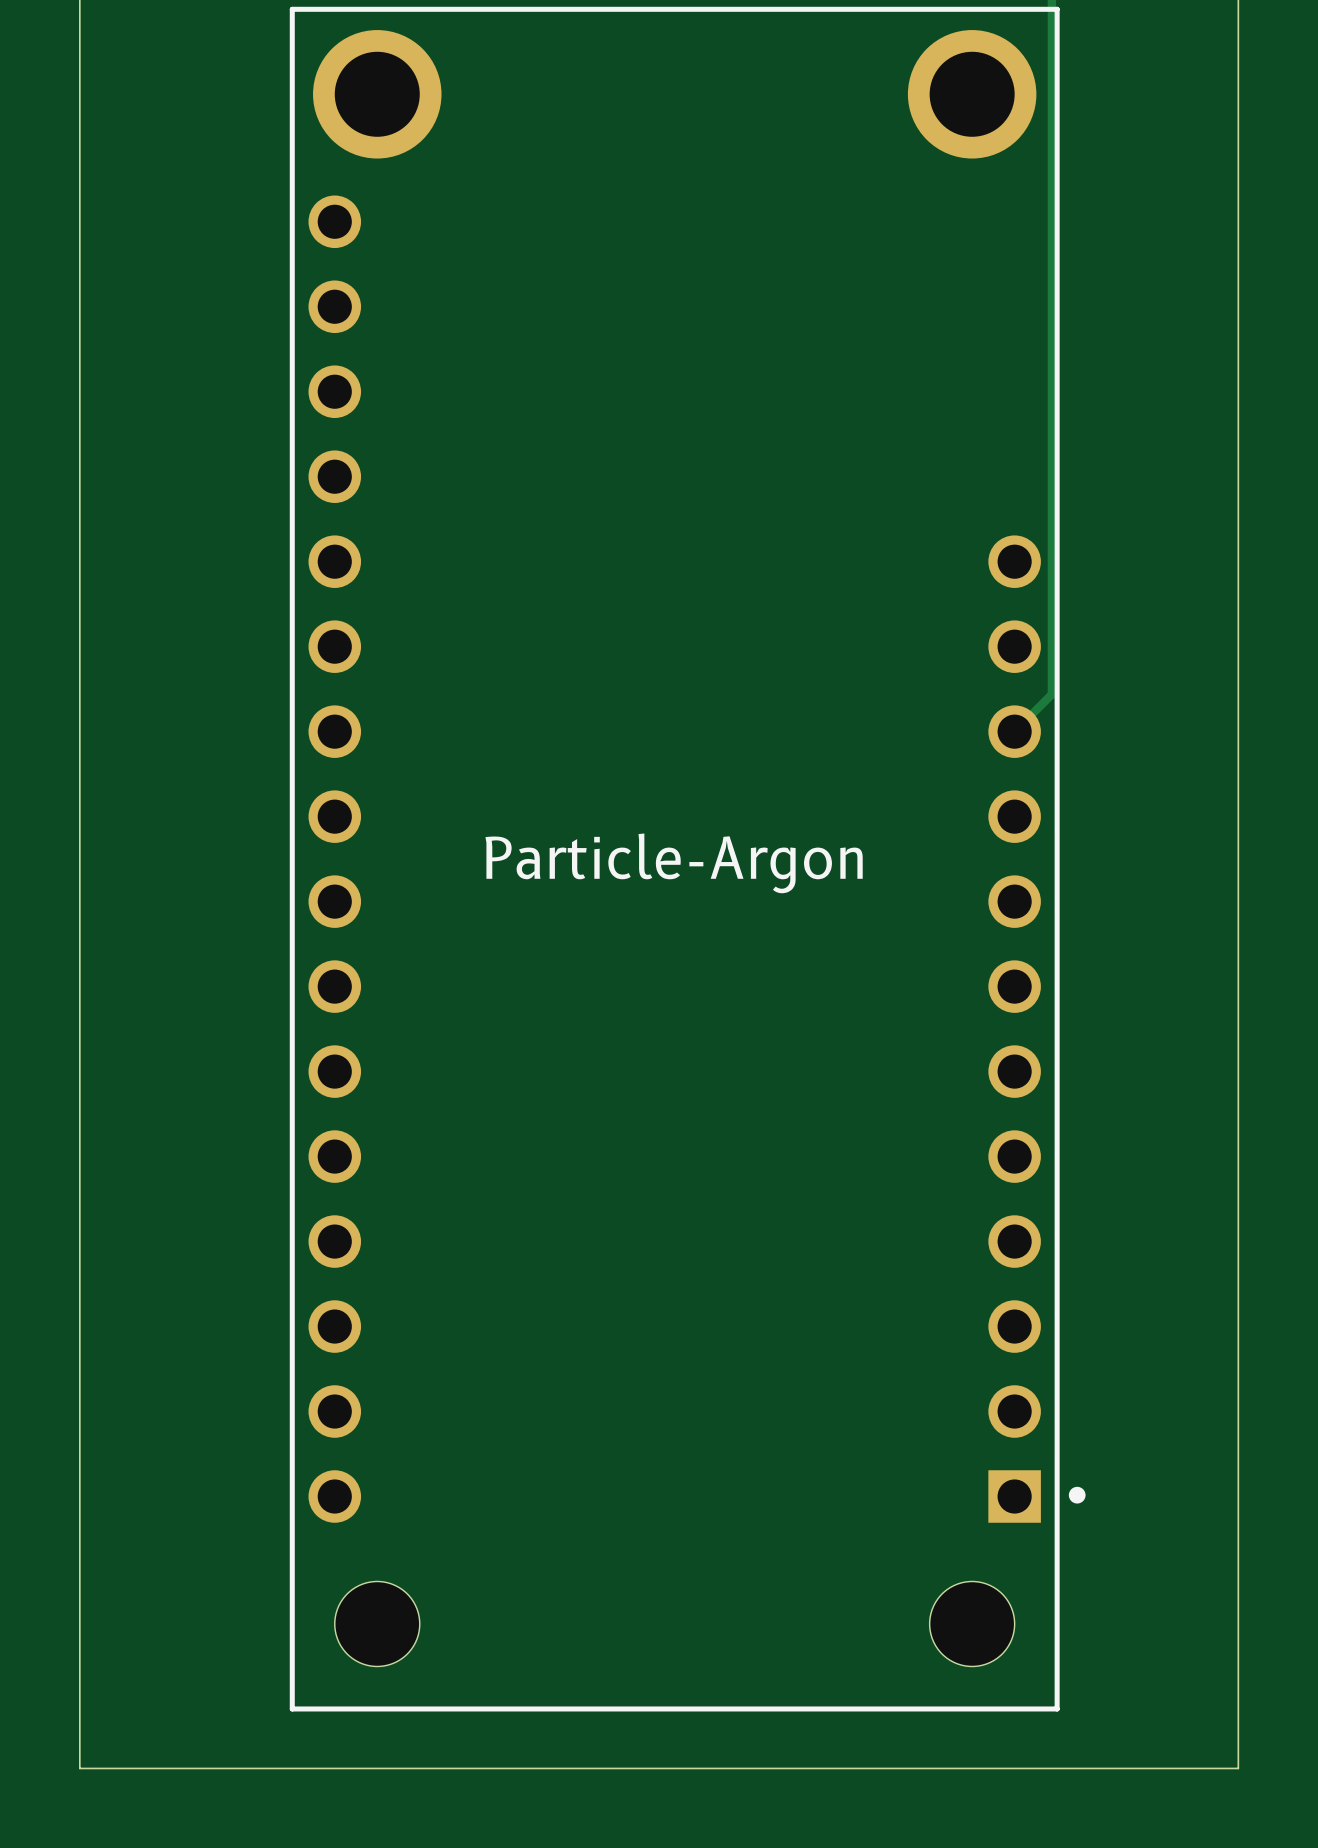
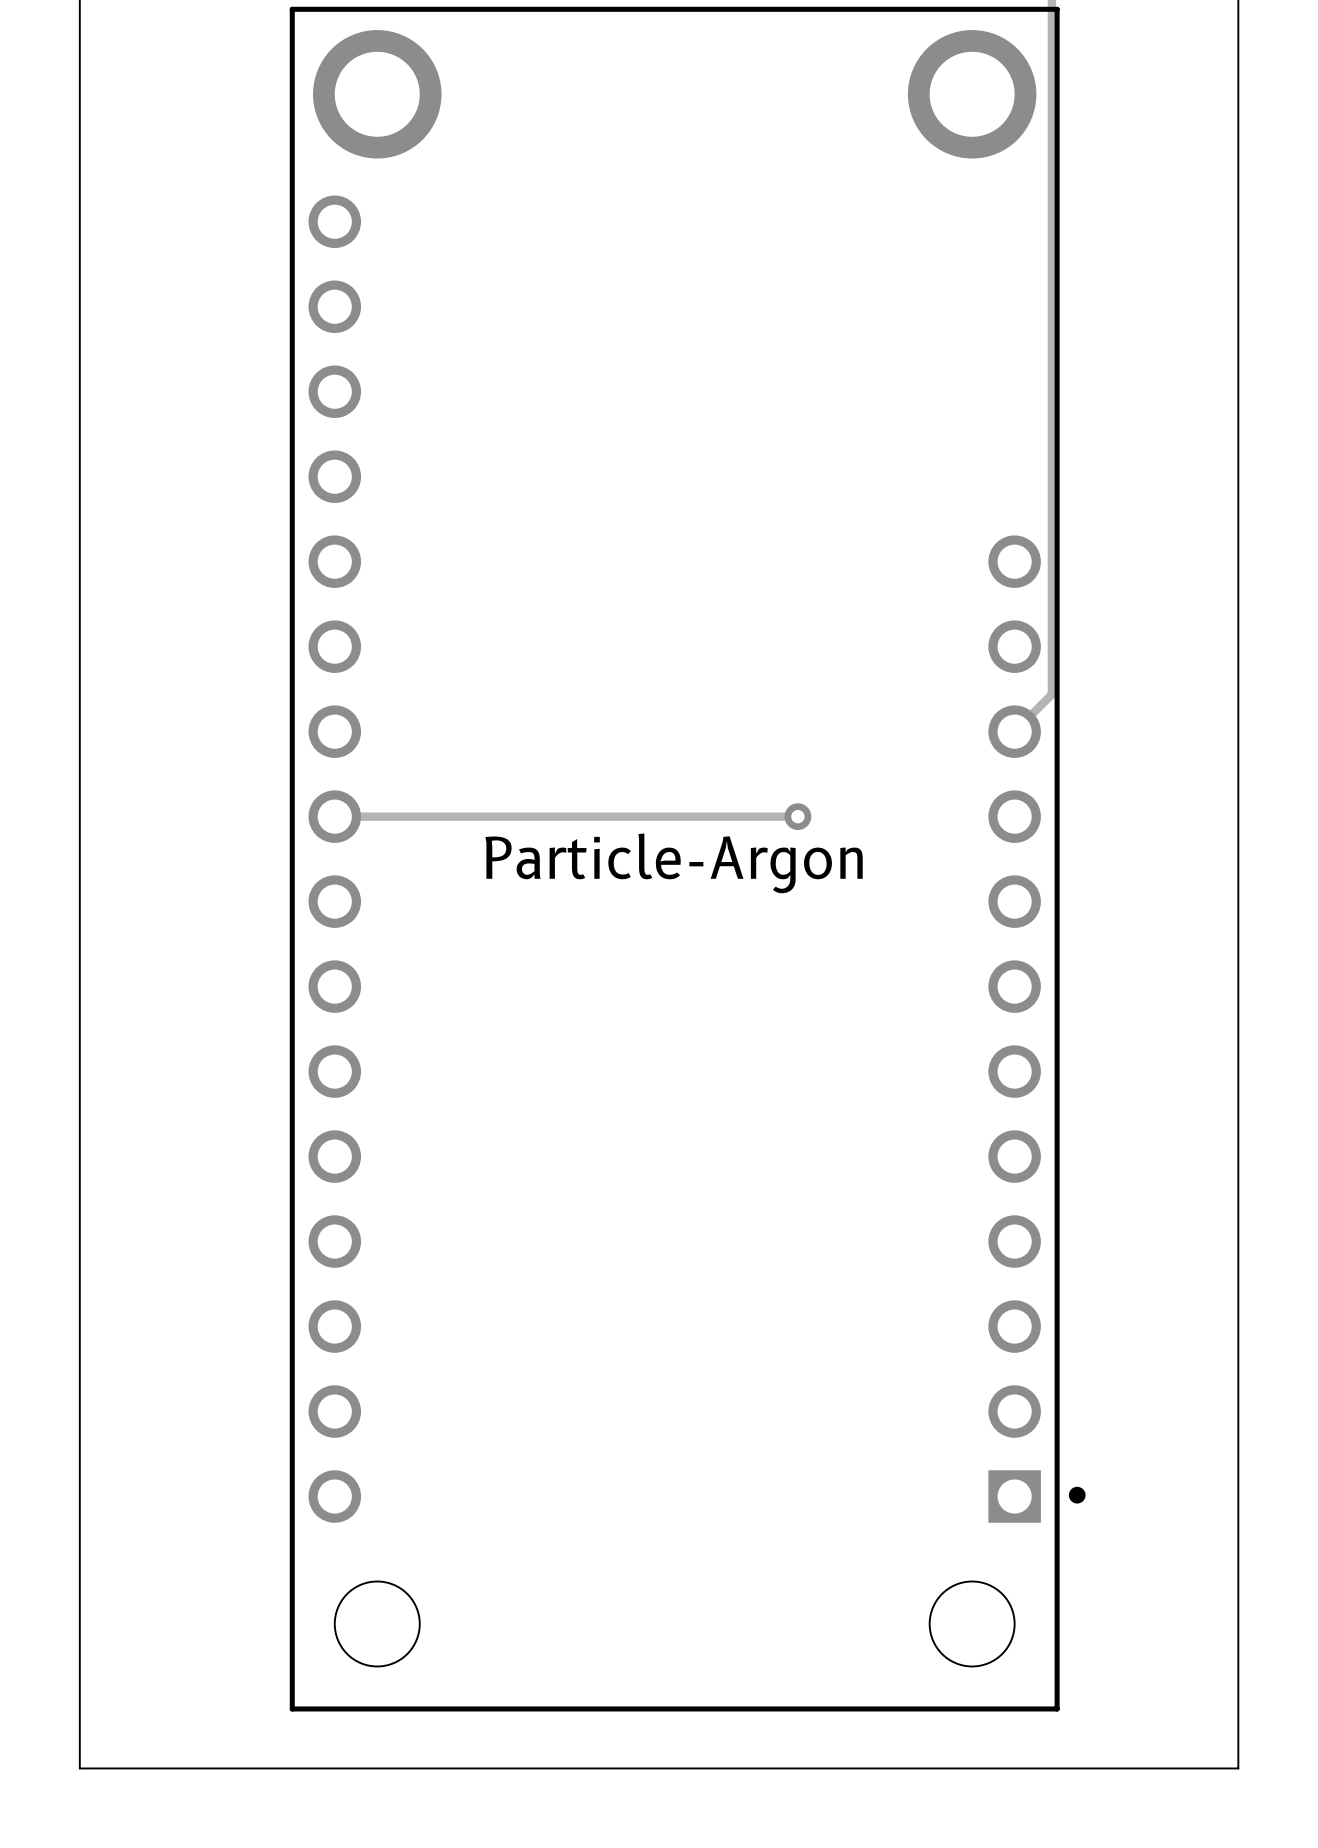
track: none -> (334, 816) (797, 816)
via: none -> (797, 816)

